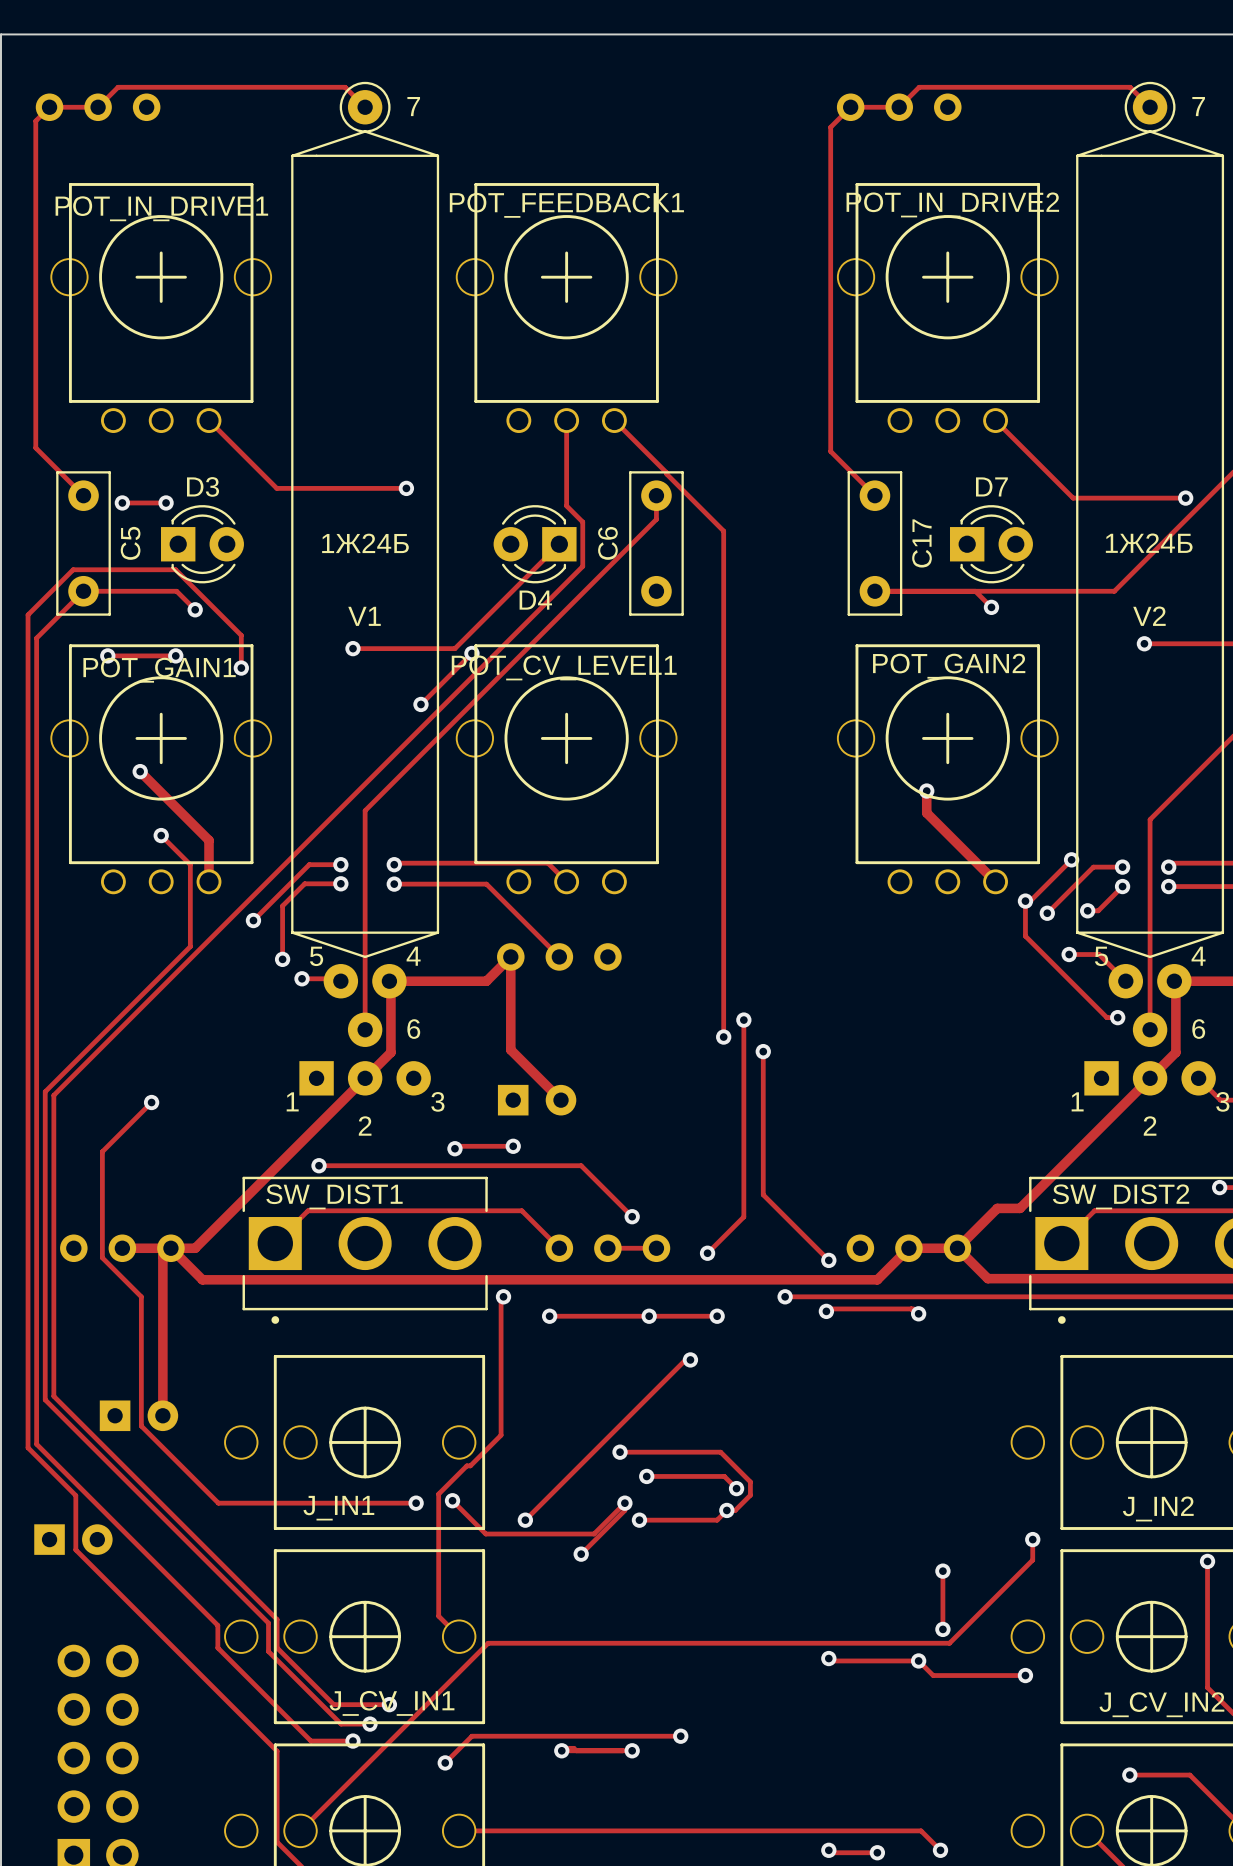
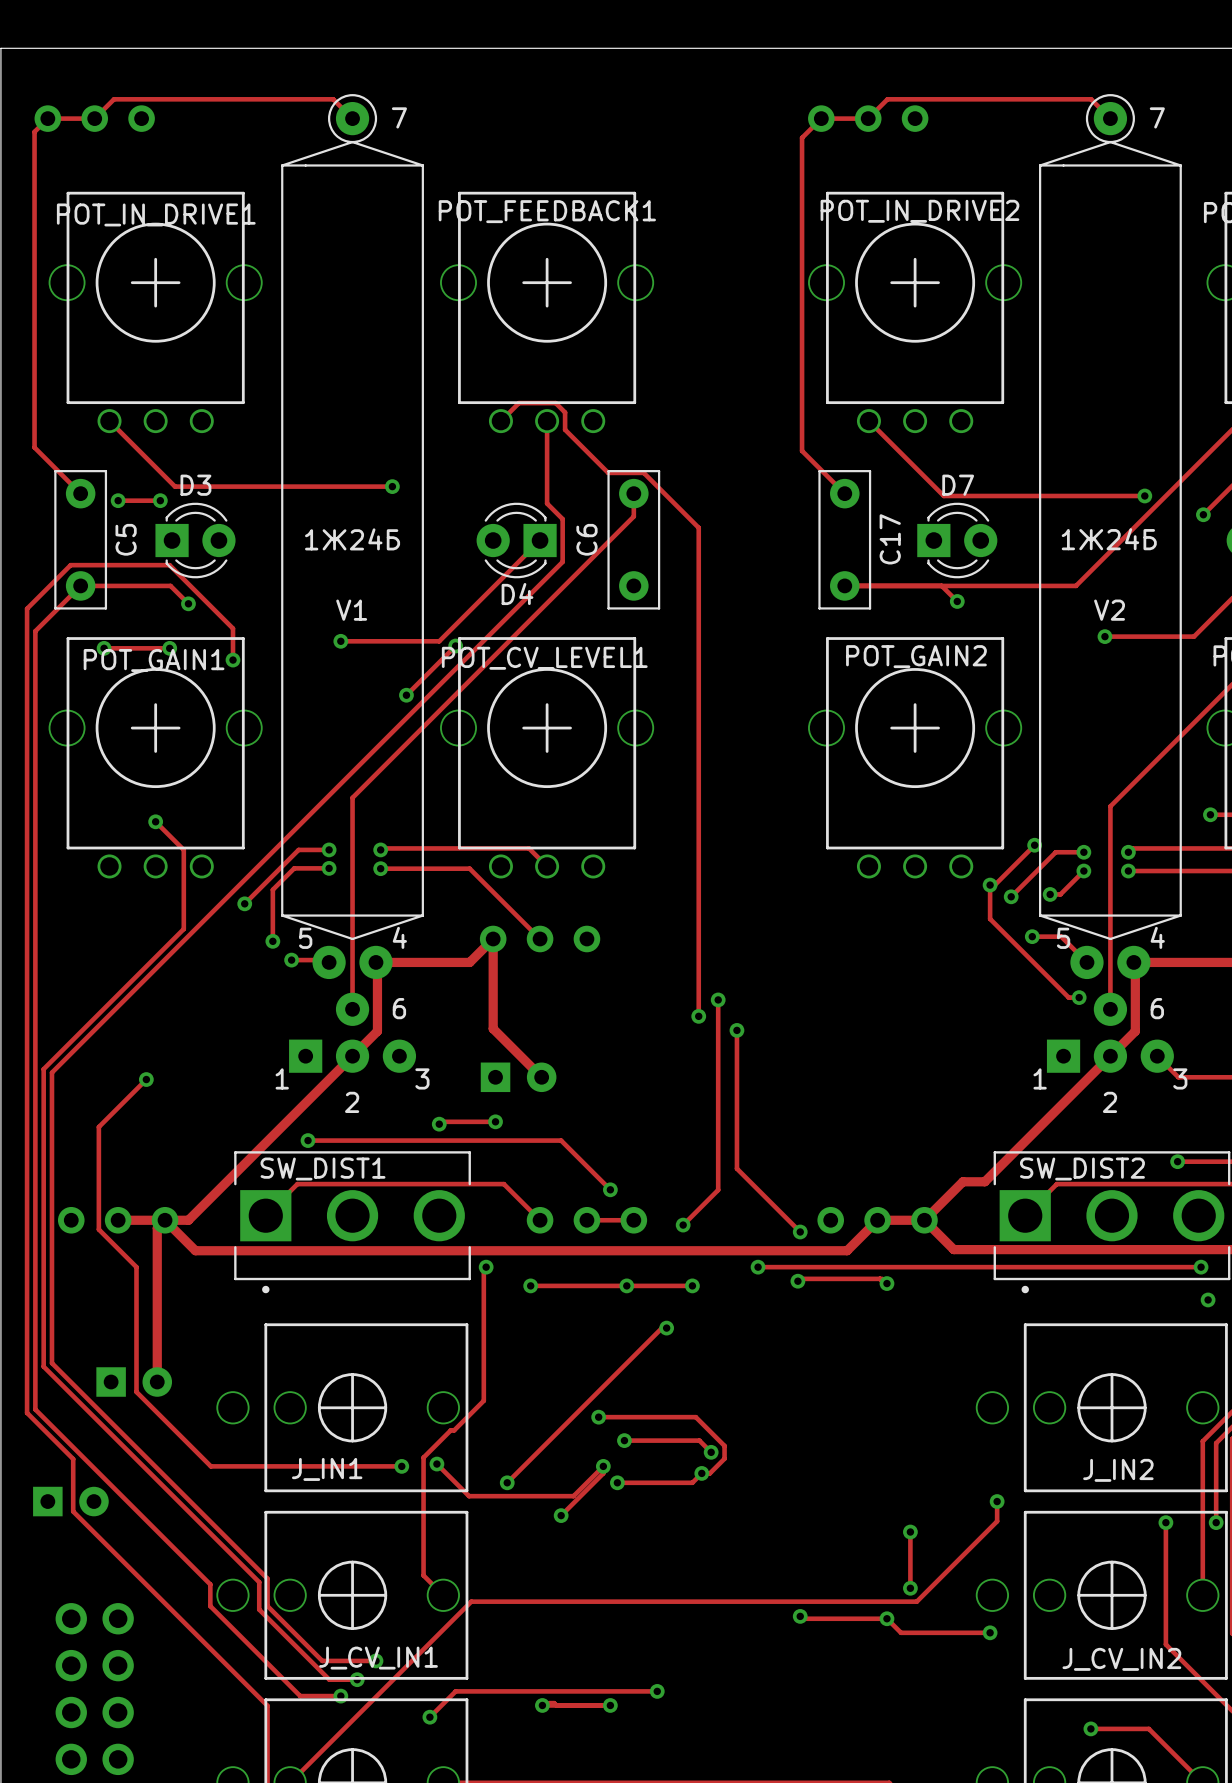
track: (209, 420) (276, 488) -> (109, 421) (175, 486) (267, 486)
track: (614, 420) (666, 474) -> (500, 421) (518, 403) (555, 403) (565, 412) (565, 429) (608, 472) (643, 472)
track: (995, 420) (1073, 498) -> (868, 421) (943, 495) (1036, 495)
track: (140, 771) (209, 840) (209, 881) -> none
via: (140, 771) -> none
track: (926, 791) (926, 813) (995, 881) -> none
via: (926, 791) -> none

